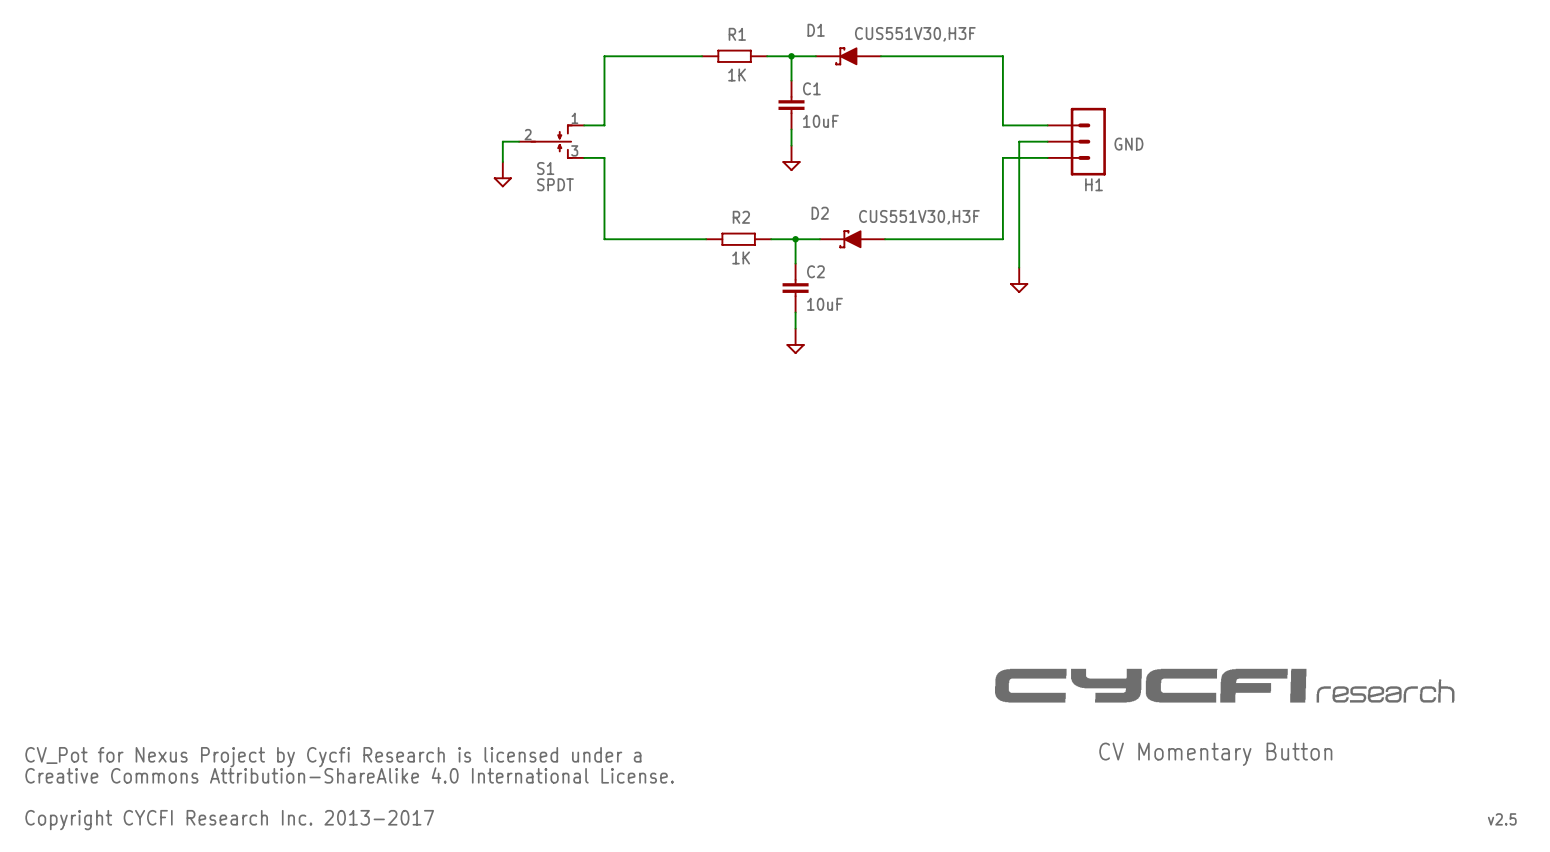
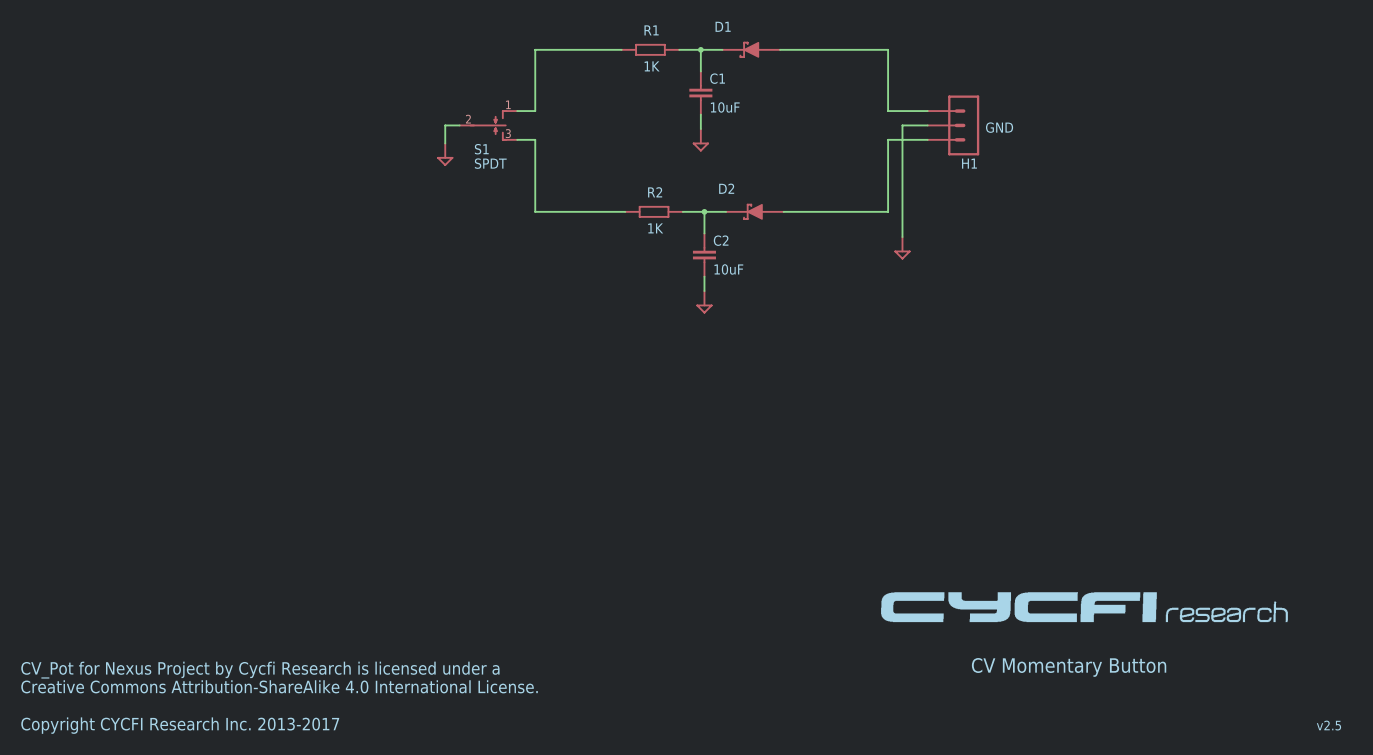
D1 value: CUS551V30,H3F (915, 34) -> none
D2 value: CUS551V30,H3F (919, 217) -> none

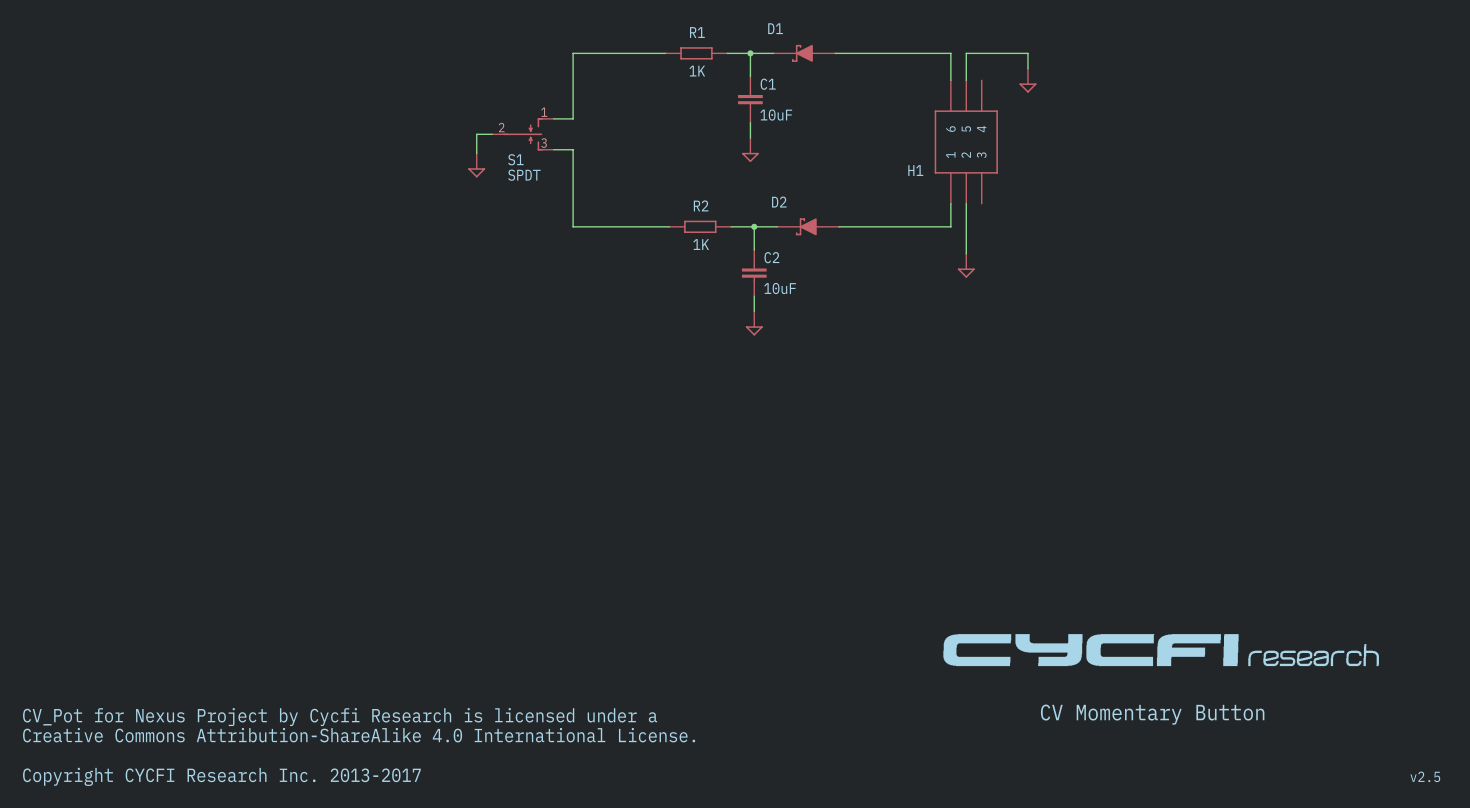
wire: none -> (1027, 68) (1027, 53) (966, 53) (966, 80)
wire: (888, 75) (888, 111) (927, 111) -> none
power symbol: none -> (1027, 80)
H1 symbol: [927, 95, 980, 156] -> [934, 80, 998, 204]
wire: (927, 125) (902, 125) (902, 190) -> none
text: GND (999, 127) -> none
wire: (927, 139) (888, 139) (888, 190) -> none
H1 name position: H1 (969, 163) -> H1 (915, 170)

